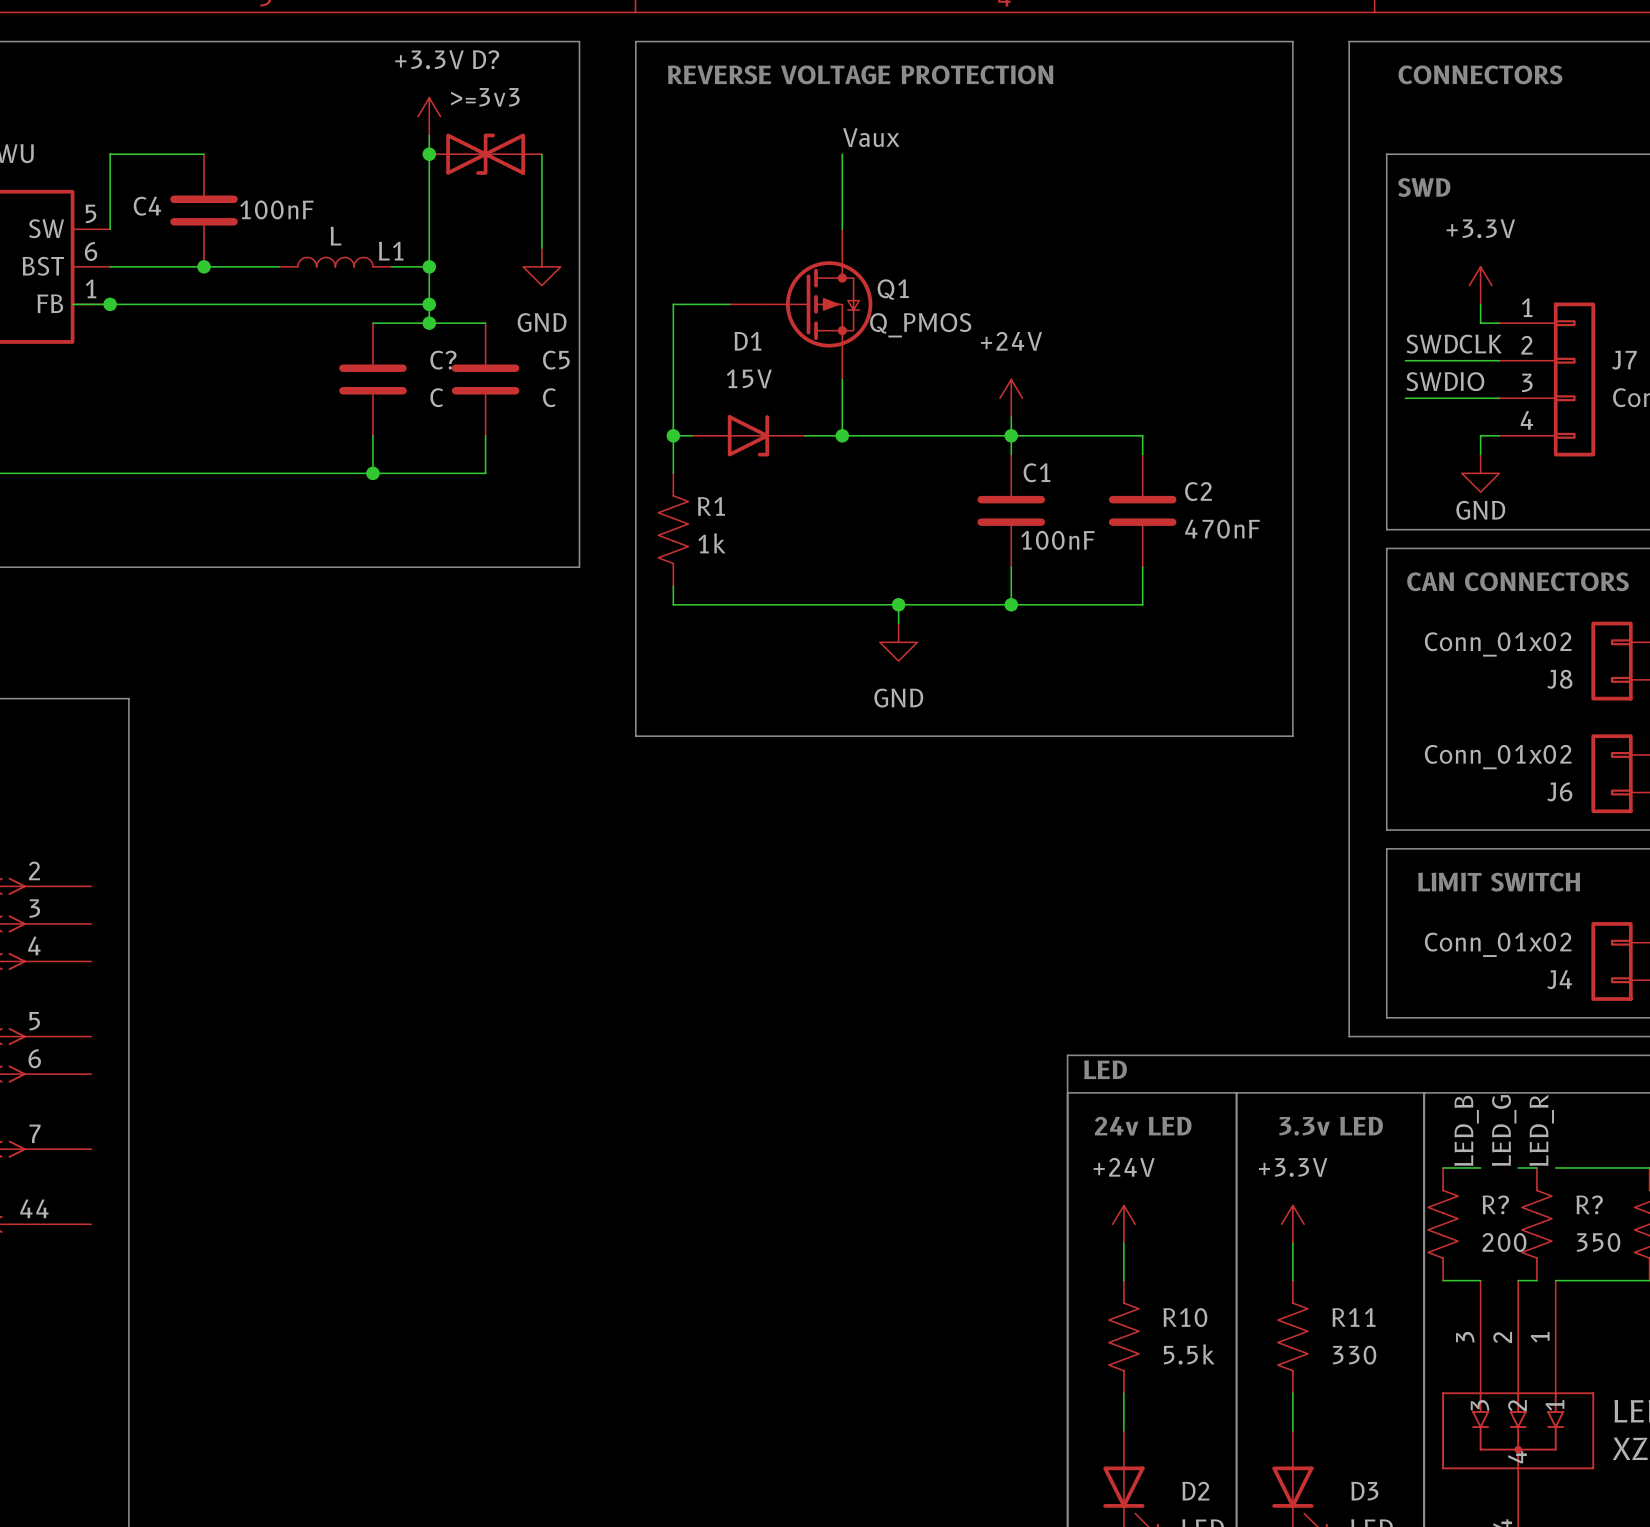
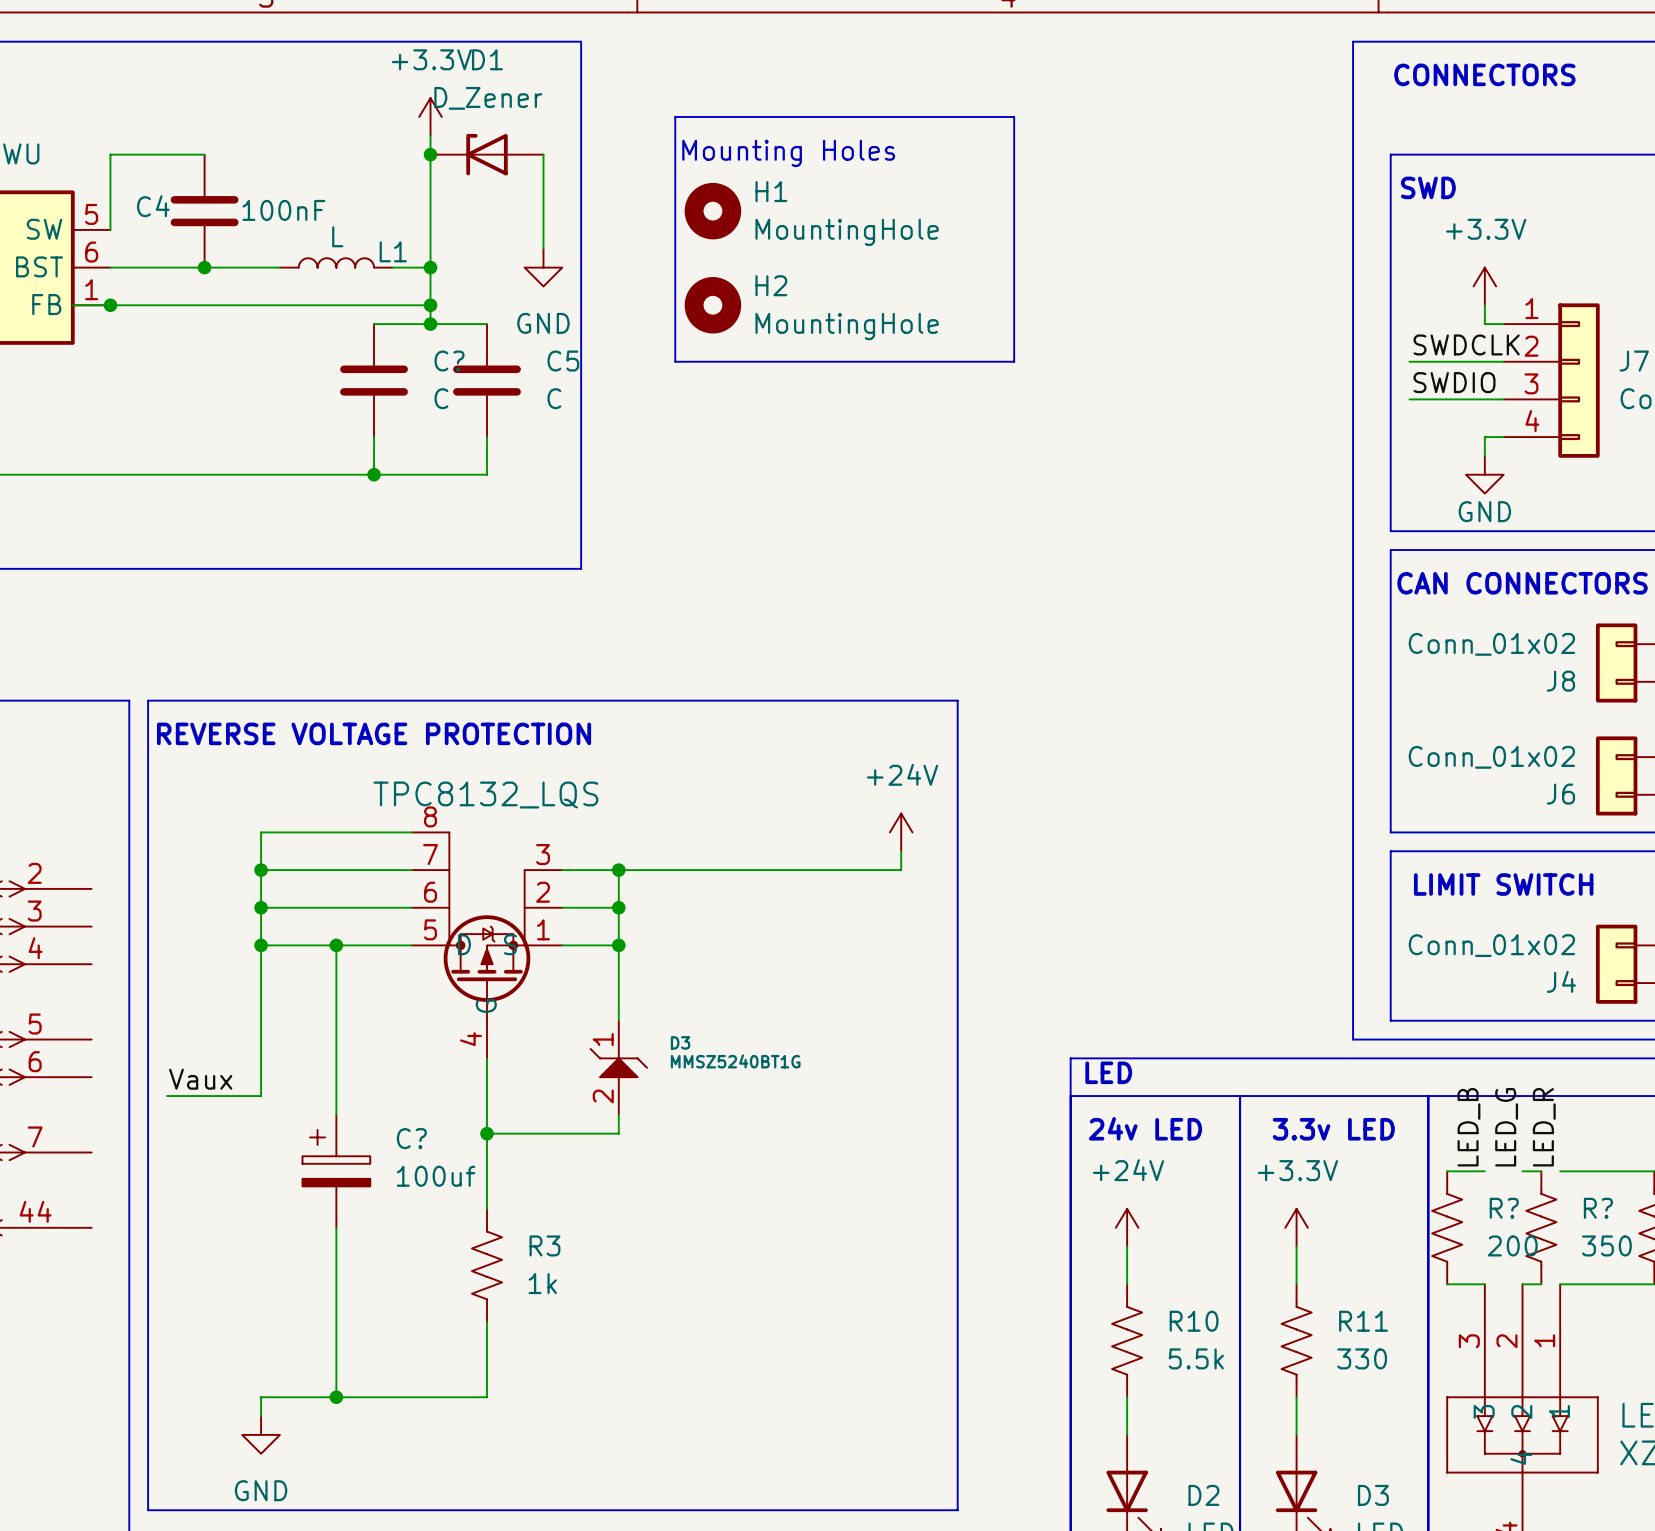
line: (635, 41) (1292, 41) (1292, 736) (635, 736) (635, 41) -> none
text: REVERSE VOLTAGE PROTECTION (860, 74) -> none
line: none -> (675, 116) (1014, 116) (1014, 361) (675, 361) (675, 116)
label: Vaux (871, 137) -> none
text: none -> Mounting Holes (788, 153)
D?: >=3v3 (485, 154) -> none
wire: (842, 154) (842, 229) -> none
H1: none -> MountingHole (712, 211)
H2: none -> MountingHole (712, 305)
wire: (729, 304) (673, 304) (673, 473) -> none
Q1: Q_PMOS (801, 304) -> none
D1 value: 15V (749, 378) -> D_Zener (488, 98)
wire: (842, 379) (842, 435) -> none
power symbol: +24V (1011, 398) -> none
wire: (1011, 417) (1011, 454) -> none
wire: (673, 435) (692, 435) -> none
junction: (673, 435) -> none
D1 rotation: 0° (748, 435) -> 180° (487, 154)
D1 position: (748, 435) -> (487, 154)
wire: (804, 435) (1142, 435) (1142, 454) -> none
junction: (842, 435) -> none
junction: (1011, 435) -> none
C1: 100nF (1011, 510) -> none
C2: 470nF (1142, 510) -> none
R1: 1k (673, 529) -> none
wire: (1011, 567) (1011, 604) -> none
wire: (1142, 567) (1142, 604) (673, 604) (673, 586) -> none
wire: (898, 604) (898, 623) -> none
junction: (898, 604) -> none
junction: (1011, 604) -> none
power symbol: GND (898, 642) -> none
line: none -> (148, 700) (957, 700) (957, 1510) (148, 1510) (148, 700)
text: none -> REVERSE VOLTAGE PROTECTION (374, 733)
wire: none -> (411, 832) (261, 832) (261, 1096) (166, 1096)
power symbol: none -> +24V (901, 832)
wire: none -> (901, 851) (901, 870) (562, 870)
wire: none -> (261, 870) (411, 870)
junction: none -> (261, 870)
wire: none -> (618, 870) (618, 1020)
junction: none -> (618, 870)
wire: none -> (261, 907) (411, 907)
junction: none -> (261, 907)
wire: none -> (562, 907) (618, 907)
junction: none -> (618, 907)
wire: none -> (261, 945) (411, 945)
junction: none -> (261, 945)
wire: none -> (336, 945) (336, 1114)
junction: none -> (336, 945)
part: none -> TPC8132_LQS (487, 945)
wire: none -> (562, 945) (618, 945)
junction: none -> (618, 945)
wire: none -> (487, 1058) (487, 1208)
D3: none -> MMSZ5240BT1G (618, 1067)
label: none -> Vaux (200, 1079)
wire: none -> (618, 1114) (618, 1133) (487, 1133)
junction: none -> (487, 1133)
C?: none -> 100uf (336, 1171)
wire: none -> (336, 1227) (336, 1397)
R3: none -> 1k (487, 1265)
wire: none -> (487, 1321) (487, 1397) (261, 1397) (261, 1416)
junction: none -> (336, 1397)
power symbol: none -> GND (261, 1434)

